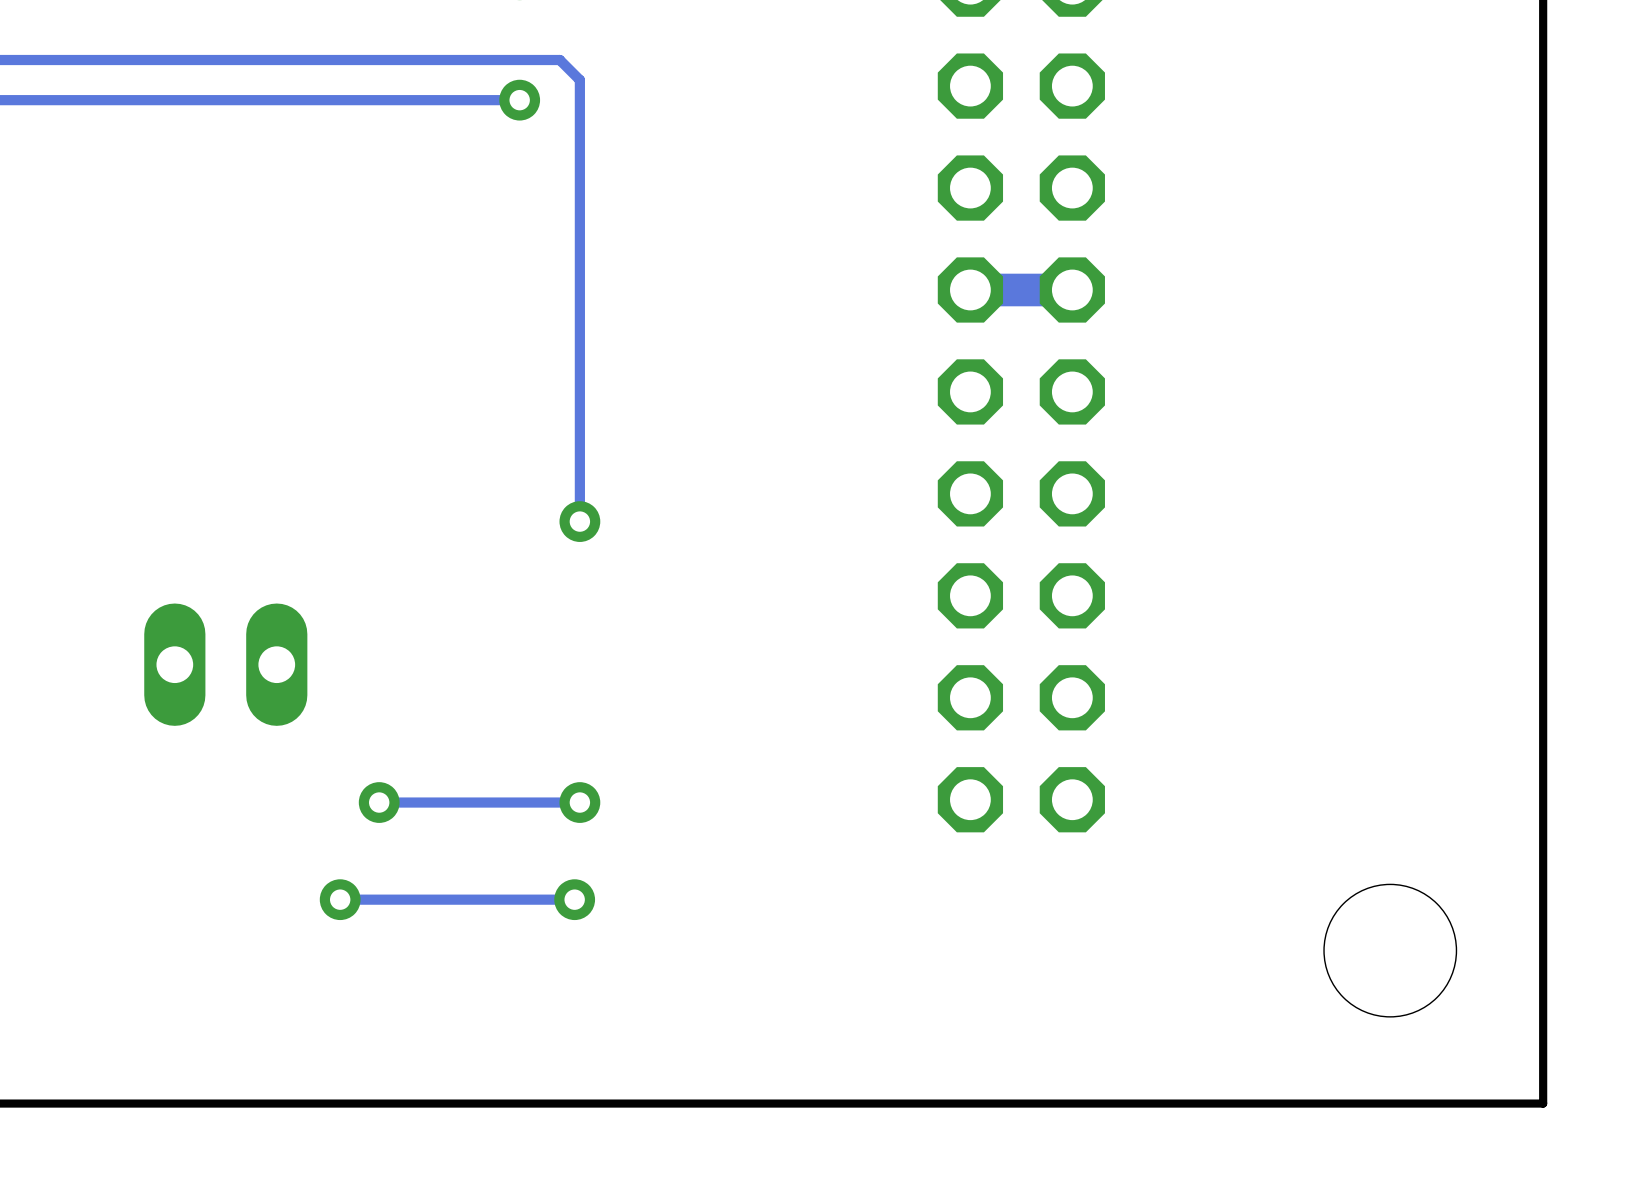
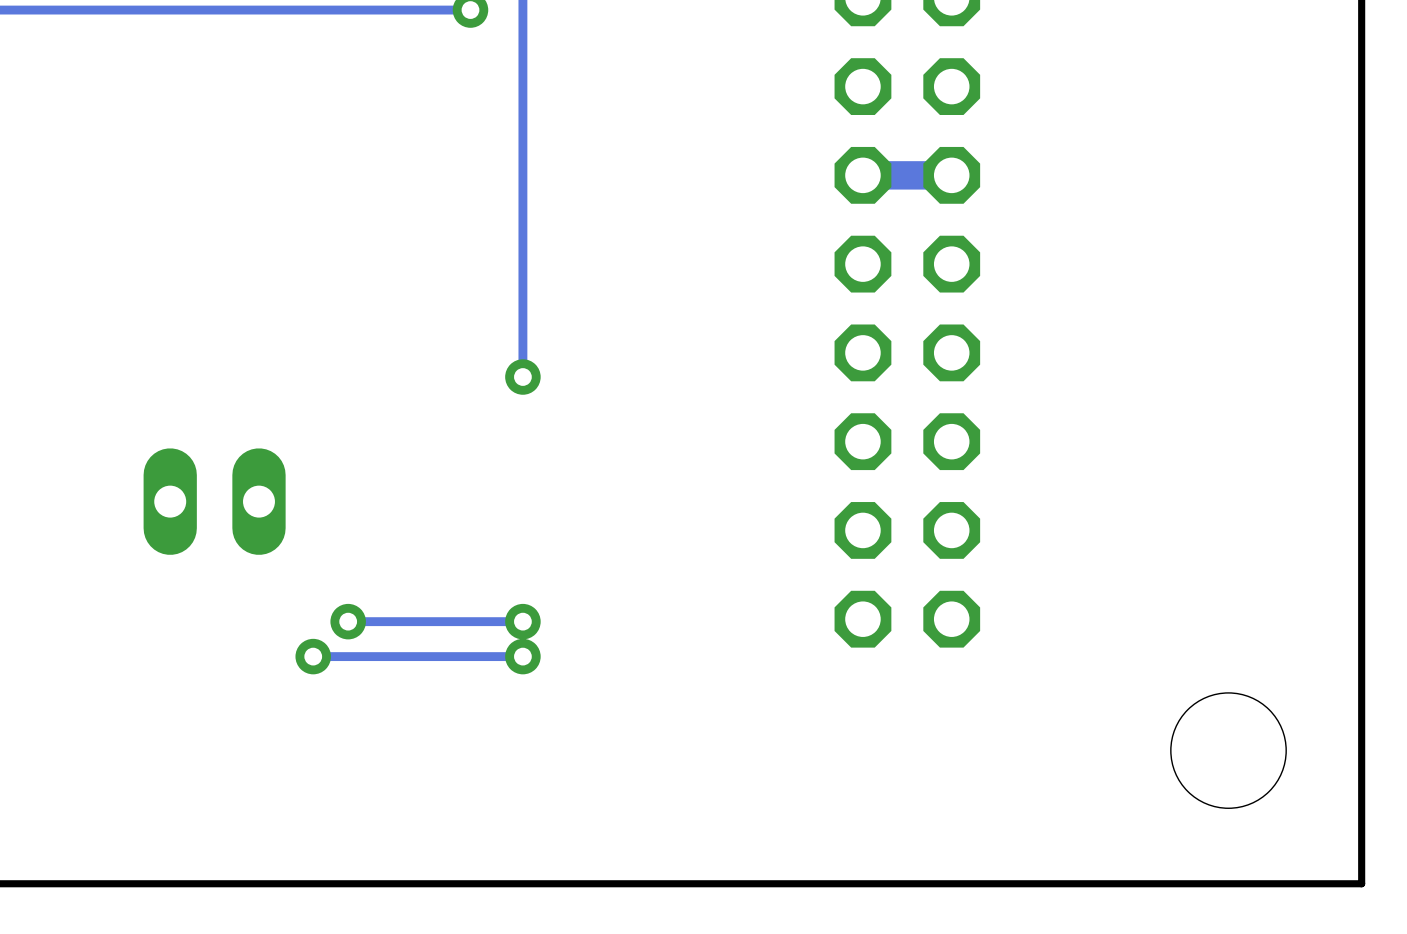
track: none -> (522, 656) (313, 656)
via position: (340, 899) -> (313, 656)
track: (574, 899) (340, 899) -> none
via position: (574, 899) -> (522, 656)

